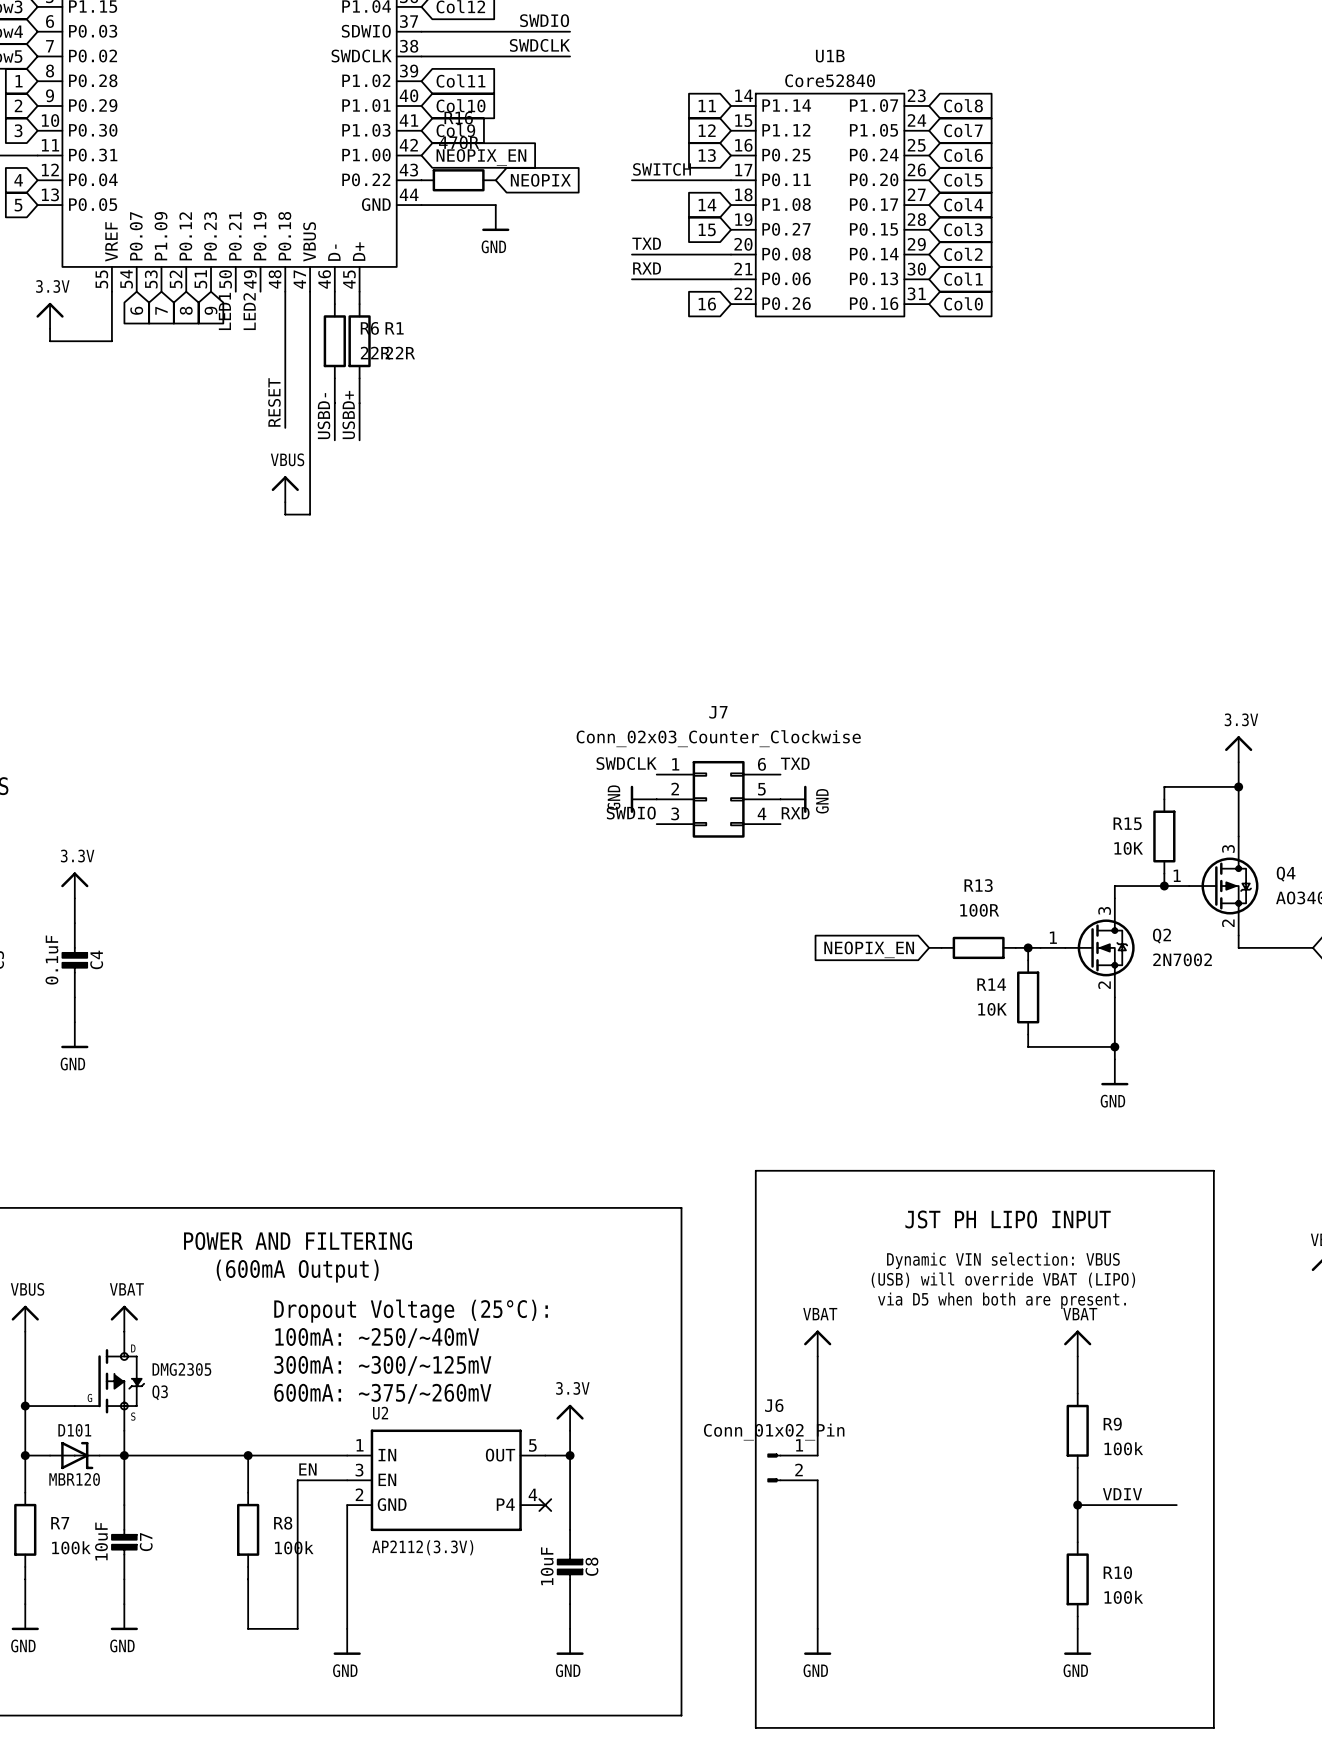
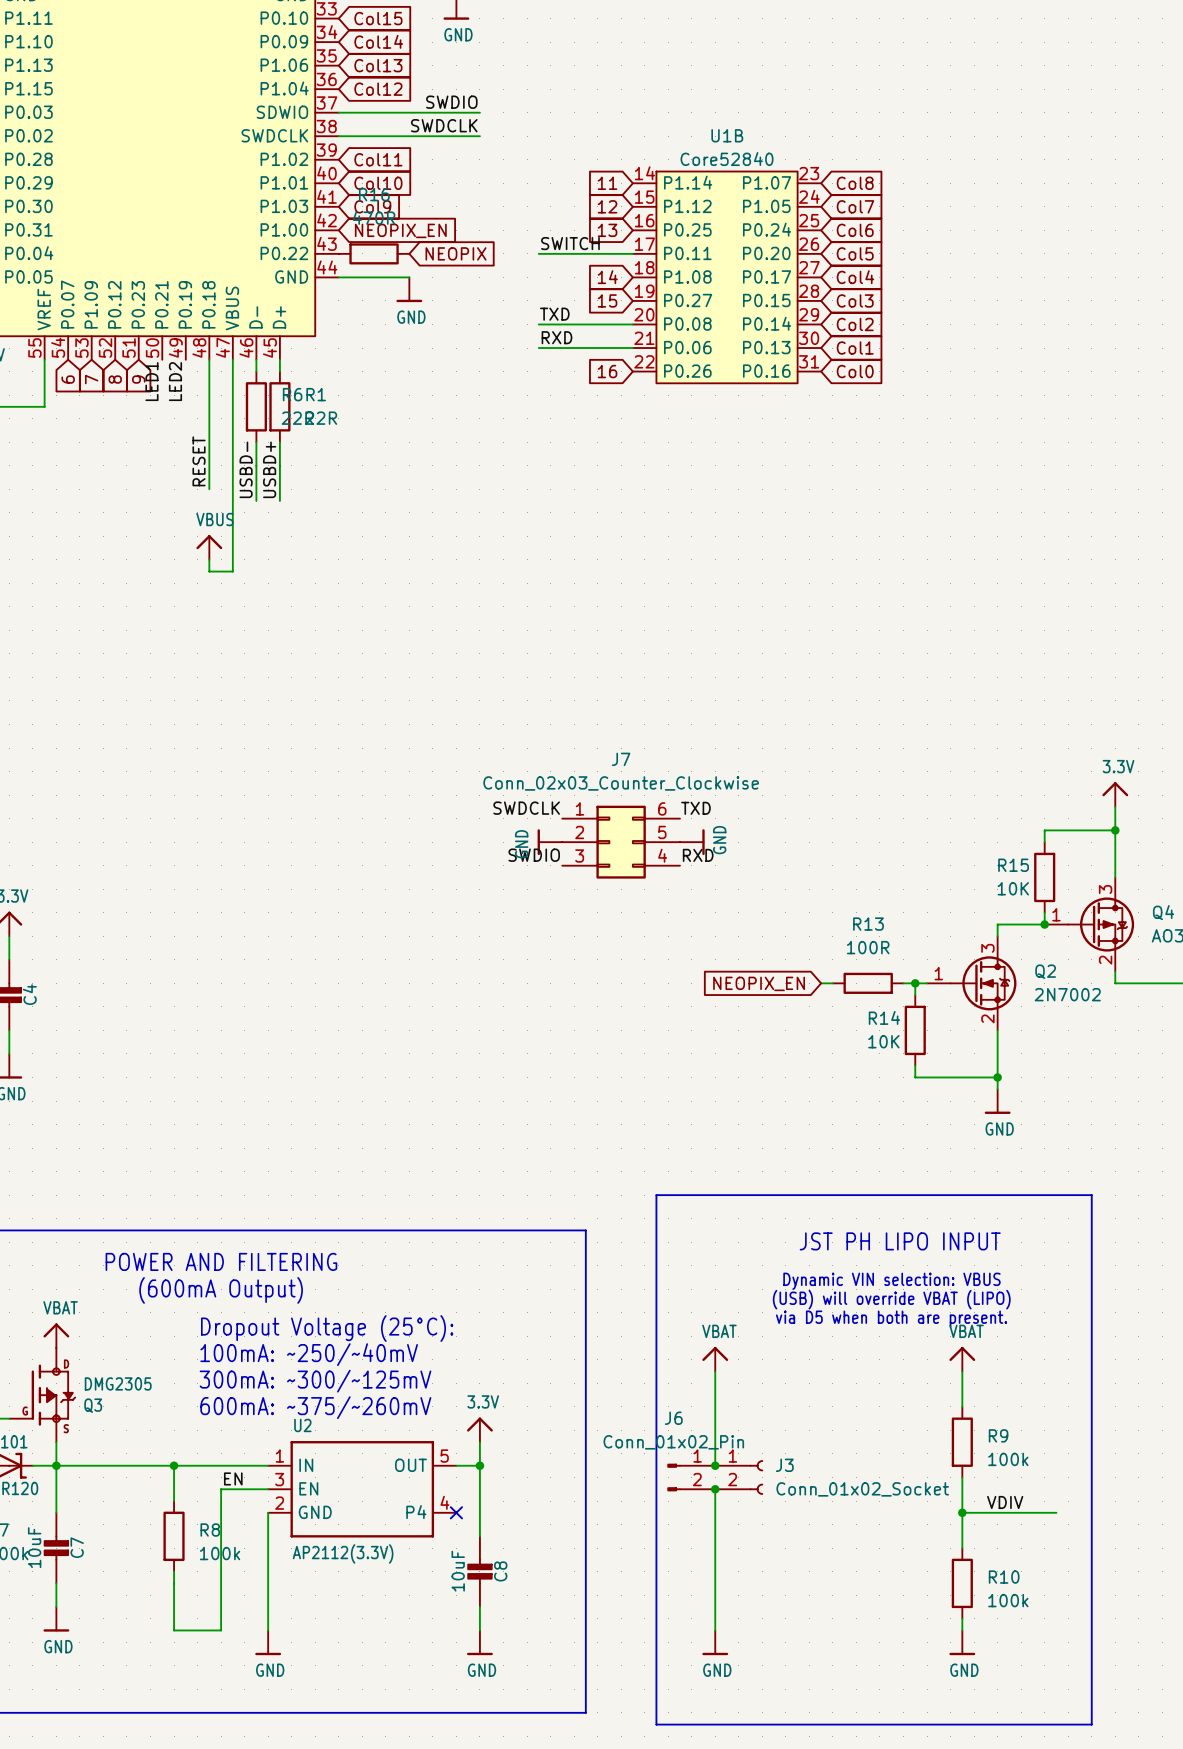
junction: none -> (715, 1465)
J3: none -> Conn_01x02_Socket (739, 1477)
junction: none -> (715, 1489)

